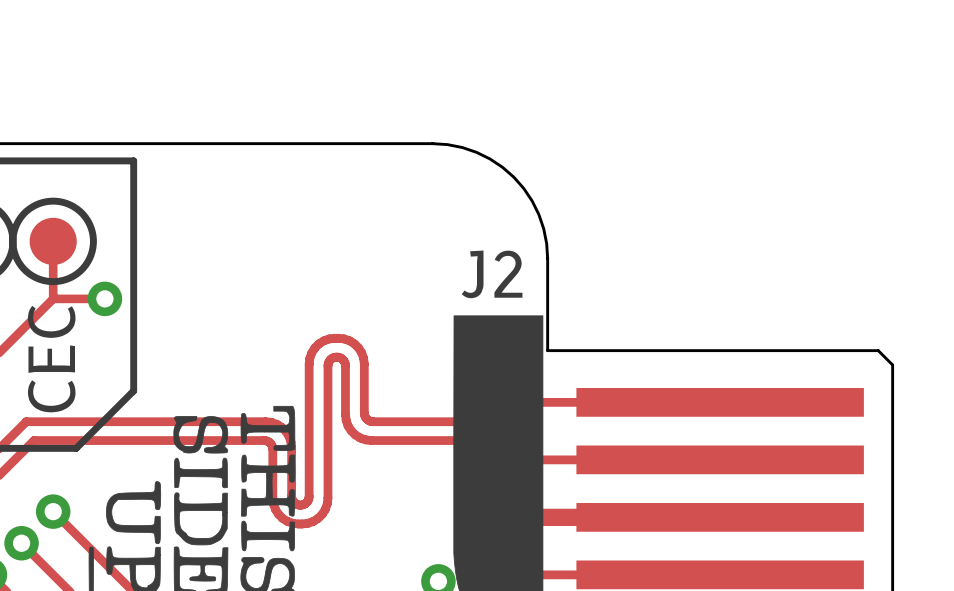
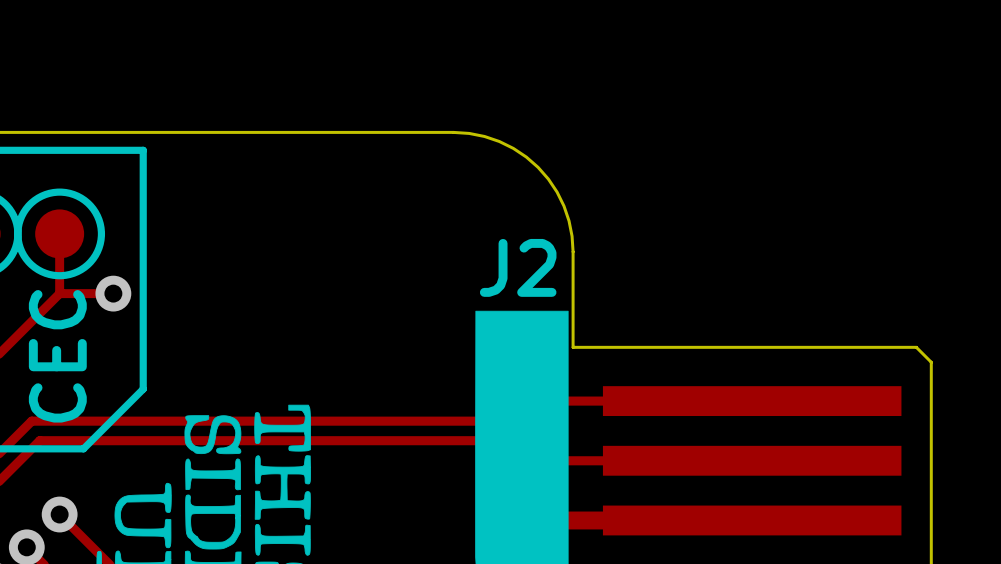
track: (265, 421) (281, 427) (289, 436) (291, 447) (291, 498) (294, 503) (300, 505) (305, 503) (308, 498) (309, 364) (311, 352) (318, 343) (329, 338) (338, 338) (349, 340) (358, 348) (364, 364) (364, 414) (367, 419) (373, 421) -> (280, 421) (391, 421)
track: (264, 440) (269, 442) (272, 447) (272, 498) (278, 514) (287, 521) (298, 524) (307, 523) (318, 518) (325, 509) (327, 498) (328, 363) (331, 358) (336, 357) (342, 358) (345, 363) (345, 414) (348, 425) (355, 434) (371, 440) -> (278, 440) (390, 440)

